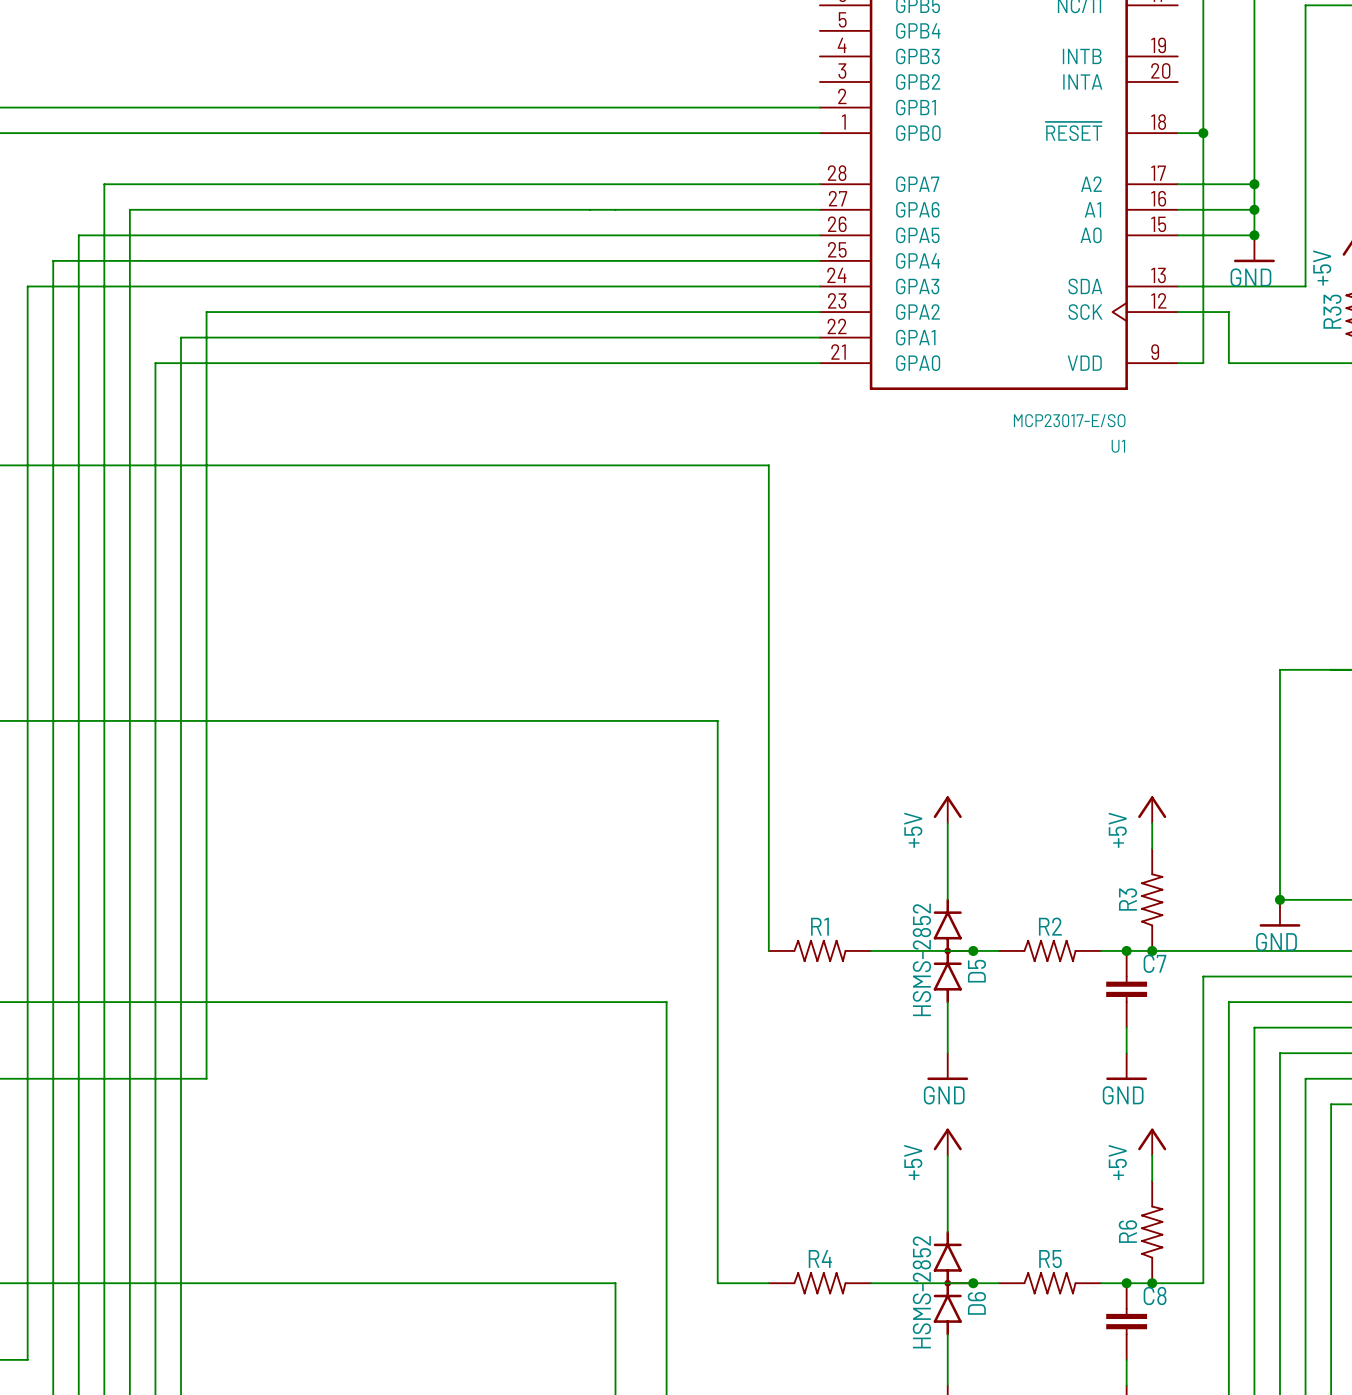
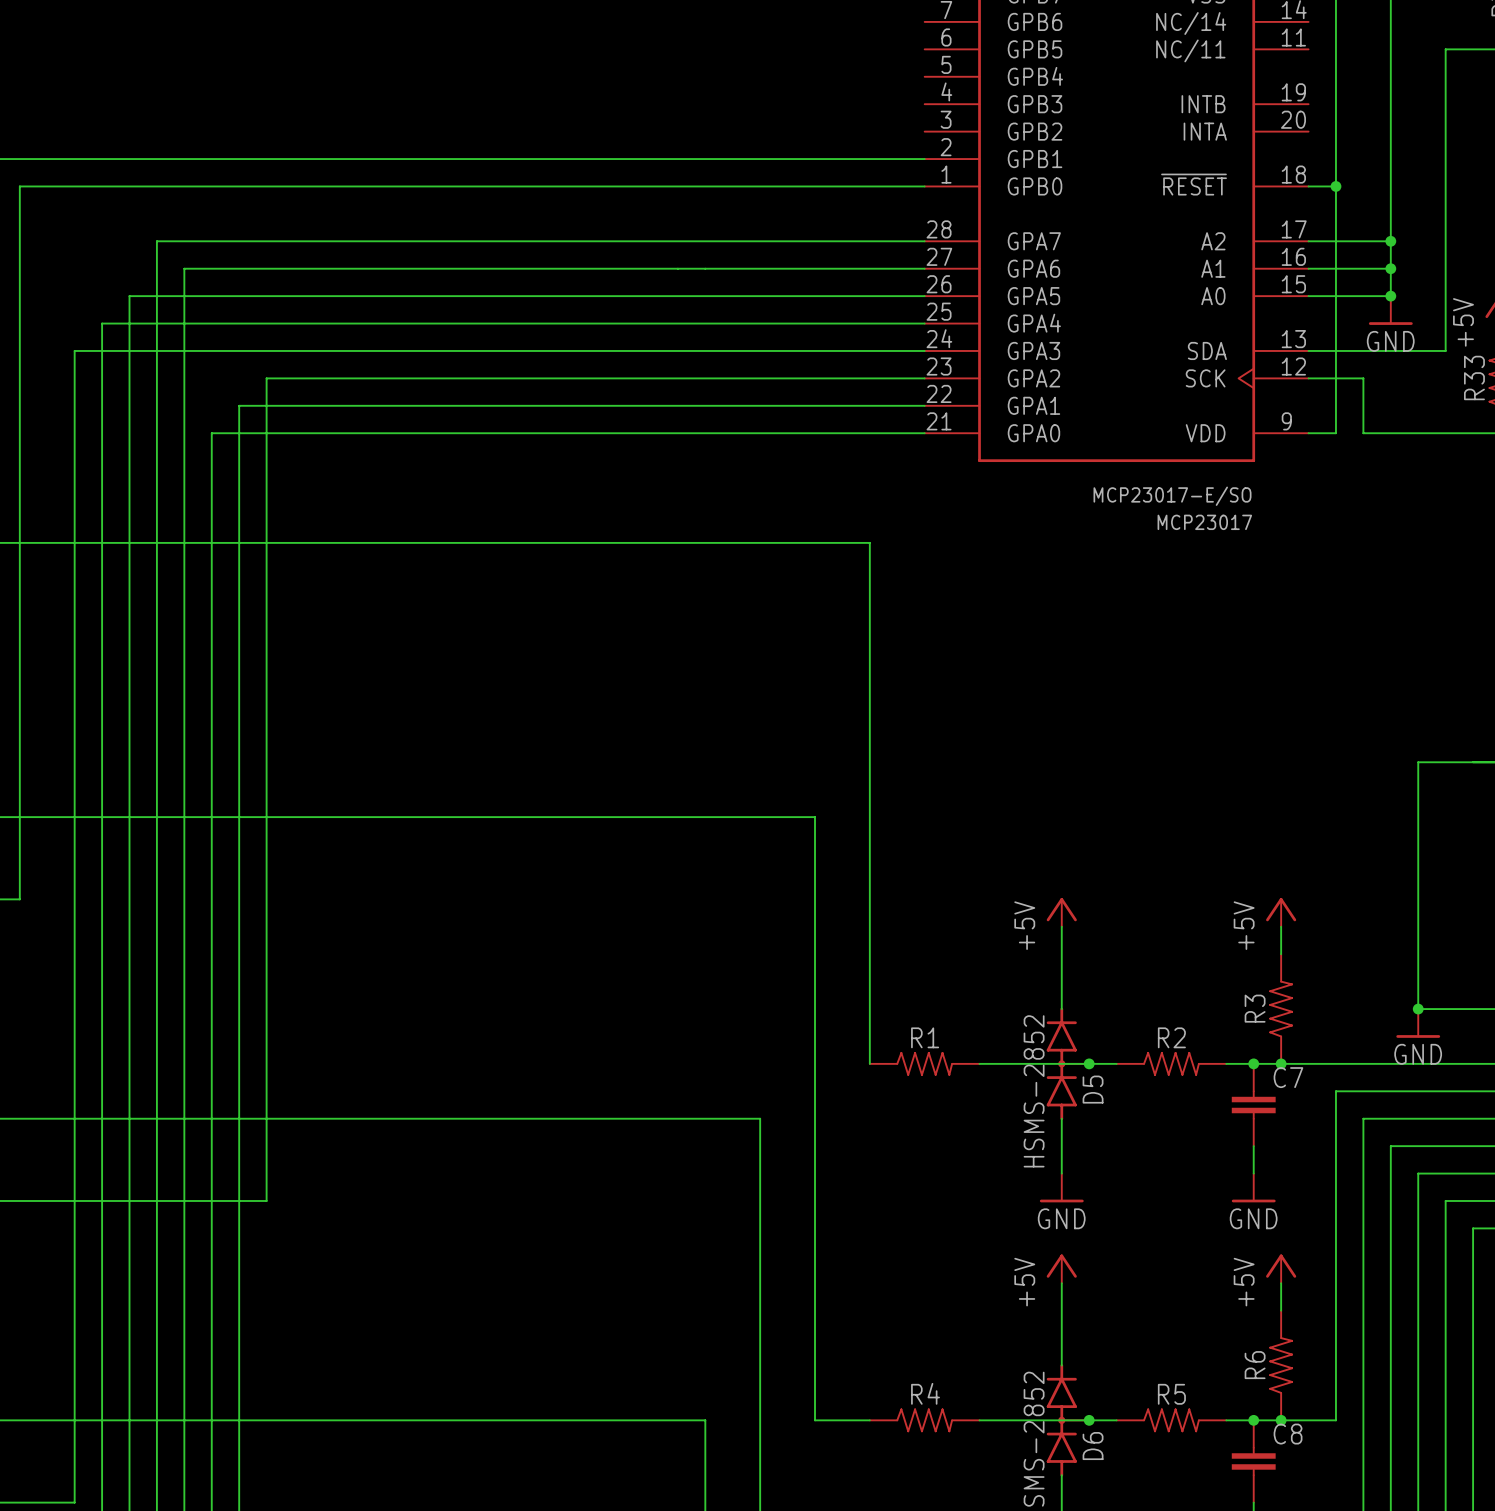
U1 name: U1 (1118, 446) -> MCP23017 (1204, 522)

